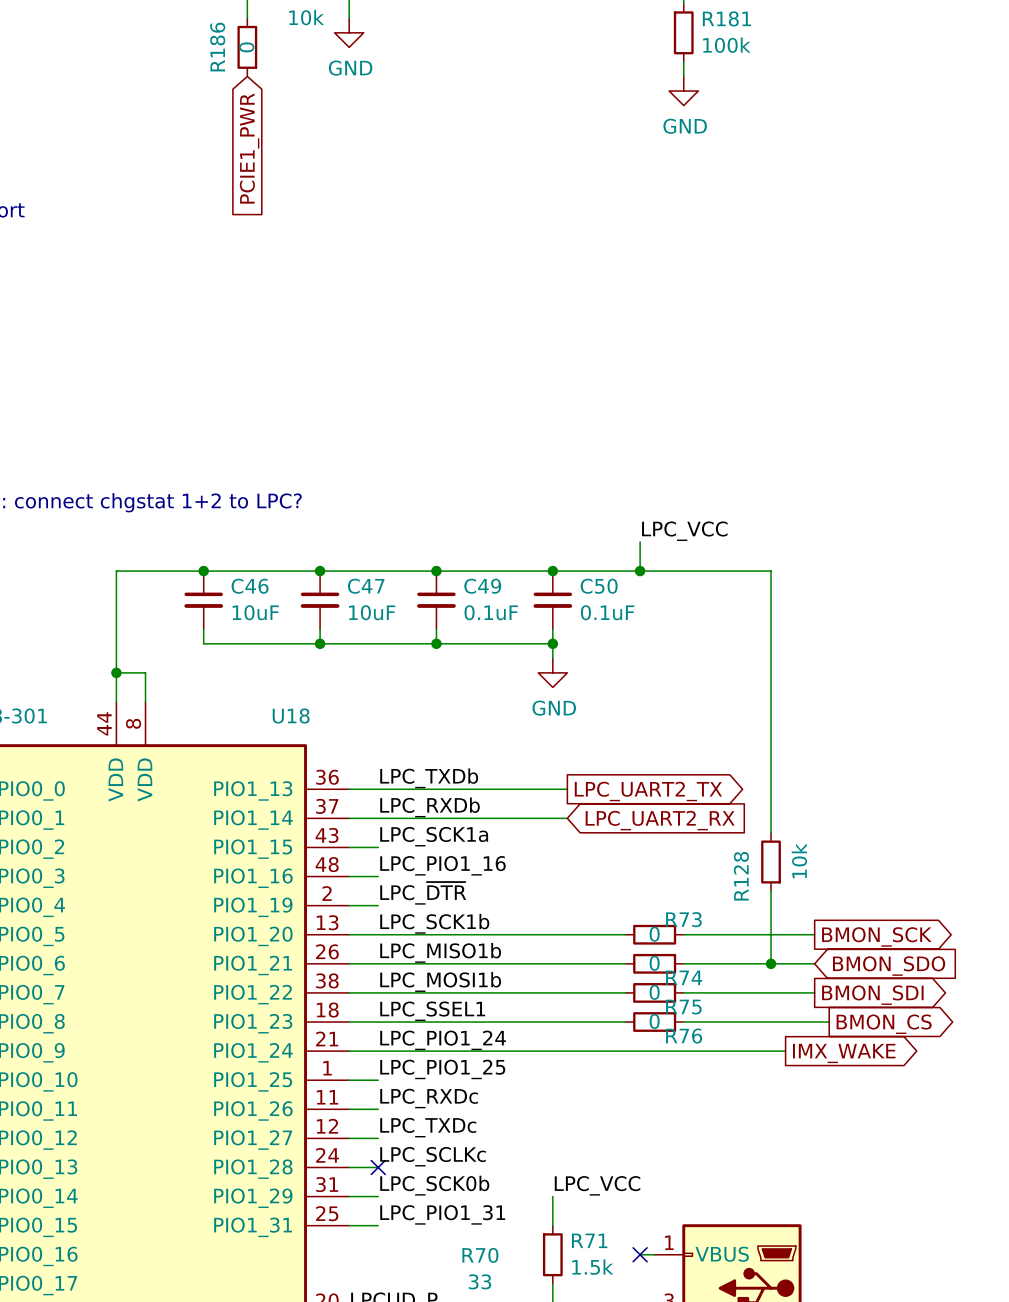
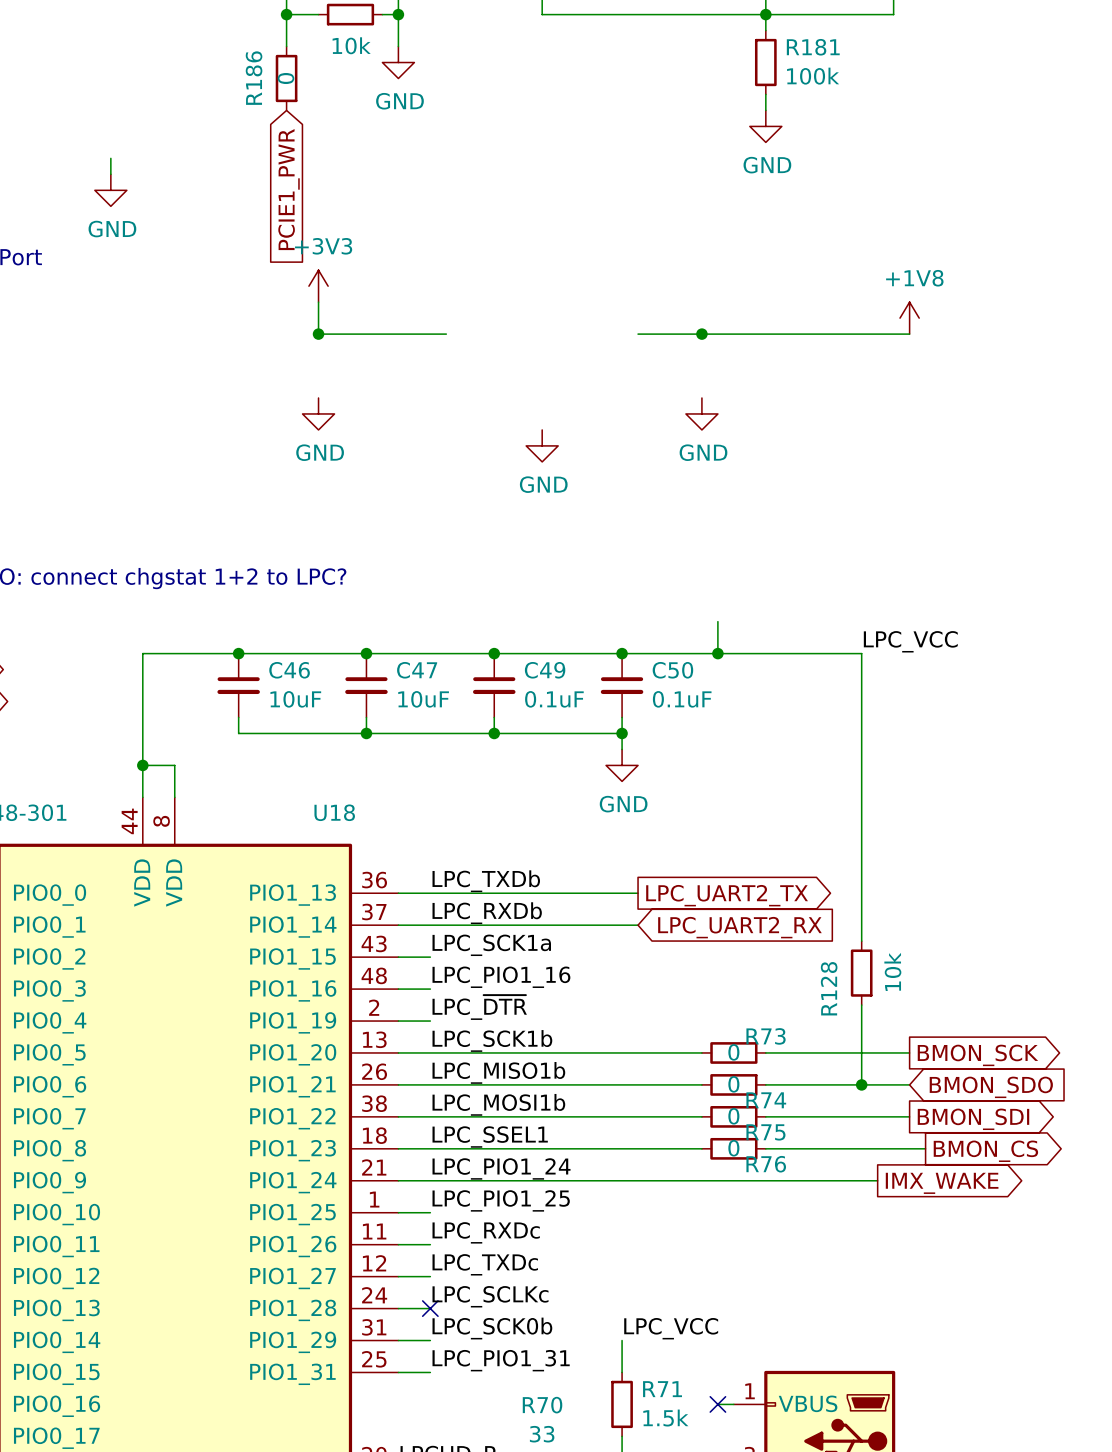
wire: none -> (110, 158) (110, 174)
power symbol: none -> GND (110, 190)
power symbol: none -> +3V3 (318, 286)
wire: none -> (318, 302) (318, 334) (446, 334)
power symbol: none -> +1V8 (909, 318)
junction: none -> (318, 334)
wire: none -> (638, 334) (909, 334)
junction: none -> (701, 334)
power symbol: none -> GND (318, 413)
power symbol: none -> GND (701, 413)
power symbol: none -> GND (542, 445)
label position: LPC_VCC (684, 531) -> LPC_VCC (910, 641)

